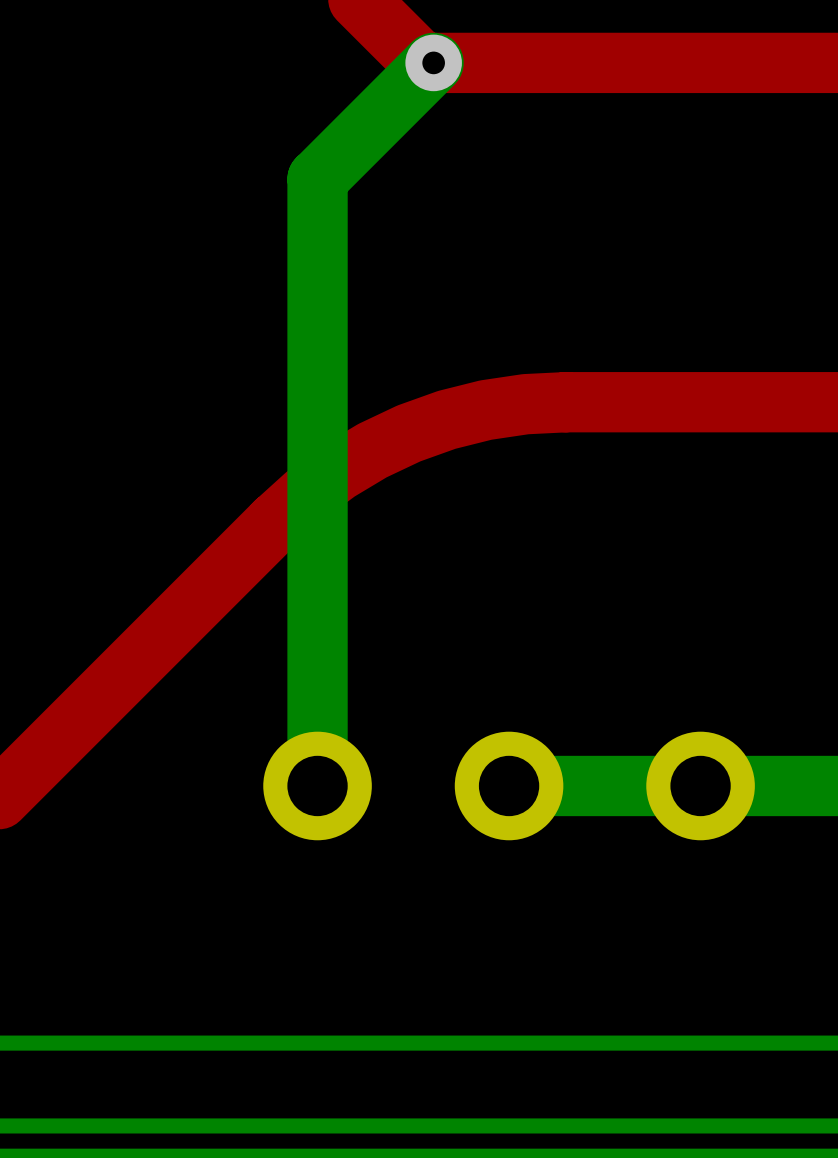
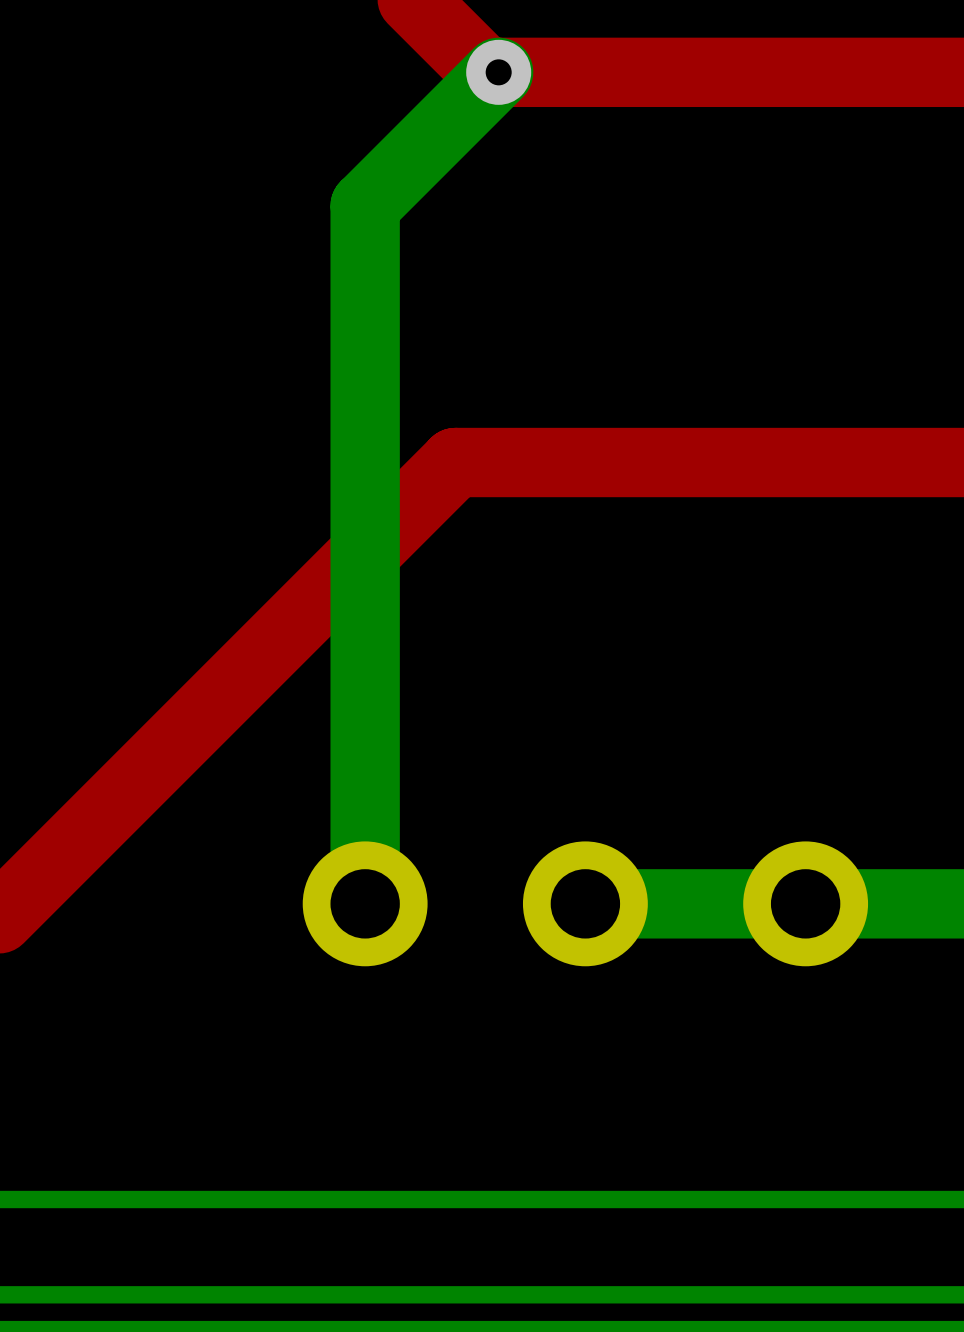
top track: (565, 402) (525, 404) (485, 410) (446, 419) (408, 433) (372, 450) (337, 471) (305, 495) (275, 522) -> (650, 462) (455, 462) (317, 600)

